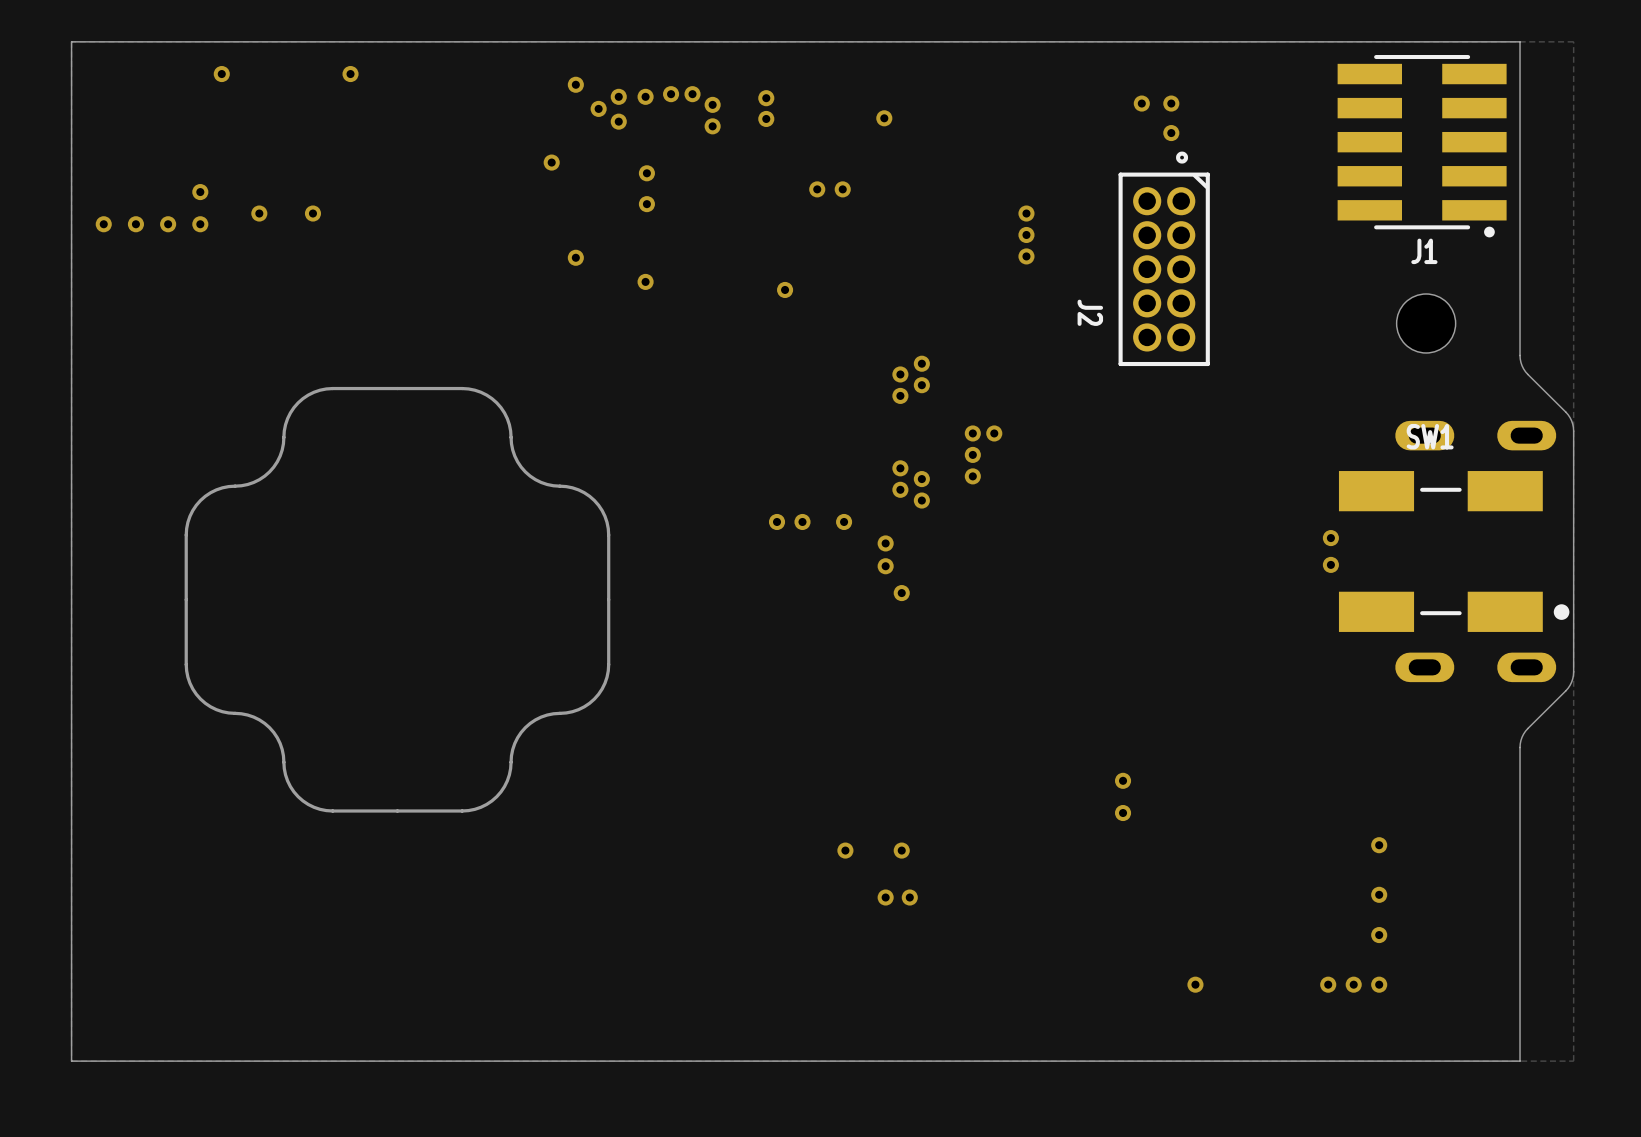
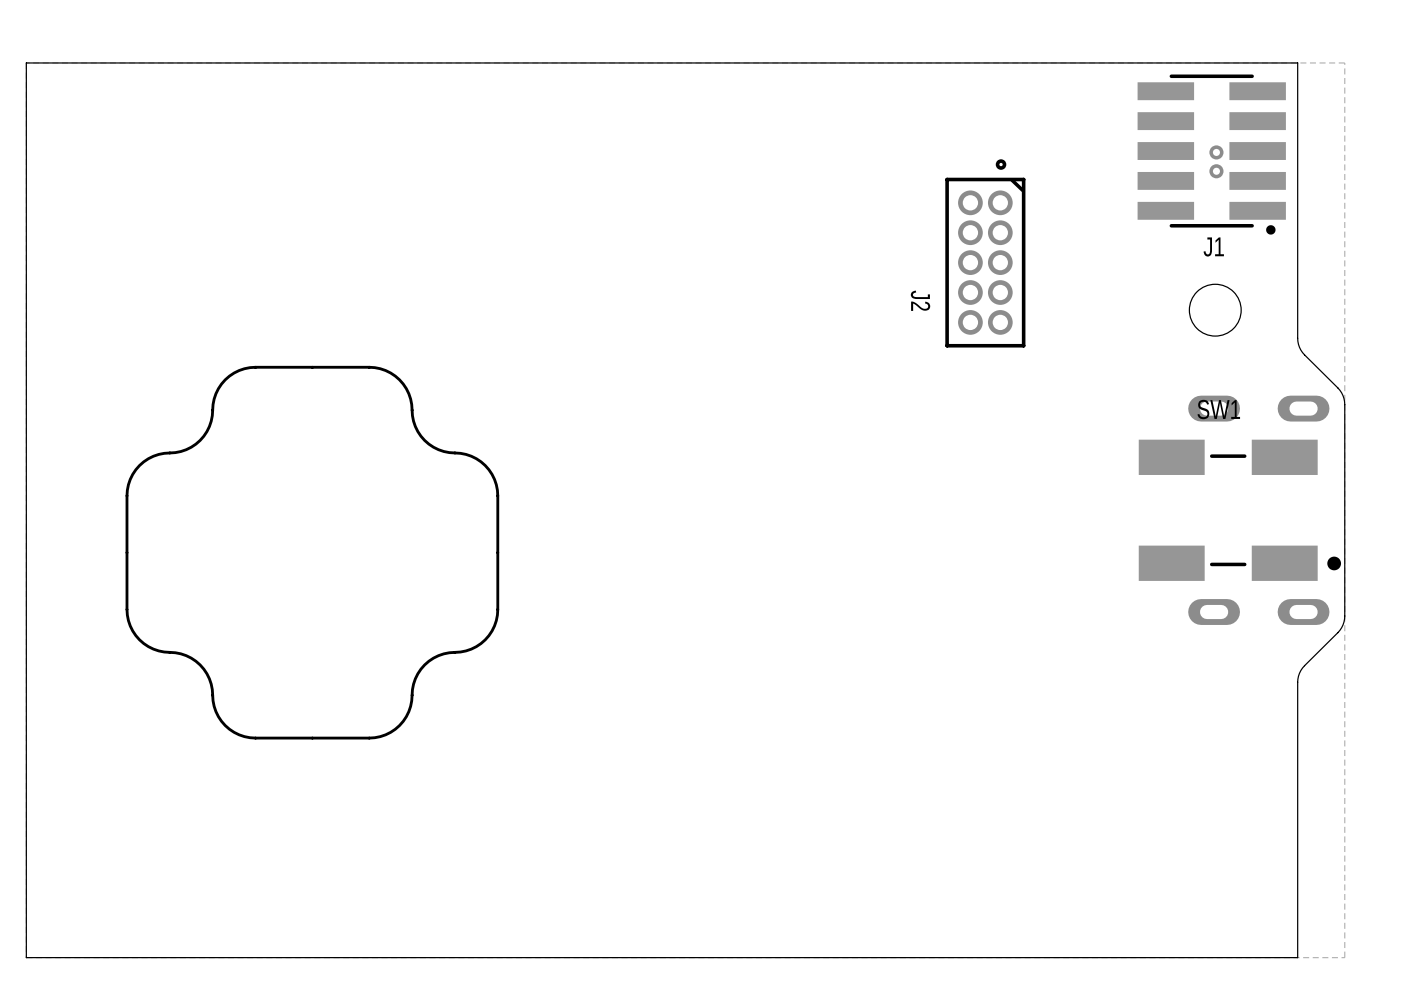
via: (221, 74) -> none
via: (350, 74) -> none
via: (575, 84) -> none
via: (671, 94) -> none
via: (692, 94) -> none
via: (618, 96) -> none
via: (645, 96) -> none
via: (766, 98) -> none
via: (1141, 103) -> none
via: (1171, 103) -> none
via: (712, 104) -> none
via: (598, 108) -> none
via: (766, 118) -> none
via: (884, 118) -> none
via: (618, 121) -> none
via: (712, 126) -> none
via: (1171, 133) -> none
via: none -> (1216, 152)
via: (551, 162) -> none
via: none -> (1216, 171)
via: (646, 173) -> none
via: (817, 189) -> none
via: (842, 189) -> none
via: (200, 192) -> none
via: (646, 204) -> none
via: (259, 213) -> none
via: (312, 213) -> none
via: (1026, 213) -> none
via: (103, 224) -> none
via: (135, 224) -> none
via: (168, 224) -> none
via: (200, 224) -> none
via: (1026, 234) -> none
via: (1026, 256) -> none
via: (575, 257) -> none
via: (645, 281) -> none
via: (785, 289) -> none
via: (921, 363) -> none
via: (900, 374) -> none
via: (921, 385) -> none
via: (900, 395) -> none
via: (972, 433) -> none
via: (994, 433) -> none
via: (972, 454) -> none
via: (900, 468) -> none
via: (972, 476) -> none
via: (921, 479) -> none
via: (900, 489) -> none
via: (921, 500) -> none
via: (777, 521) -> none
via: (802, 521) -> none
via: (844, 521) -> none
via: (1330, 538) -> none
via: (885, 543) -> none
via: (1330, 564) -> none
via: (885, 566) -> none
via: (901, 593) -> none
via: (1123, 780) -> none
via: (1123, 813) -> none
via: (1379, 845) -> none
via: (845, 850) -> none
via: (901, 850) -> none
via: (1379, 894) -> none
via: (885, 897) -> none
via: (909, 897) -> none
via: (1379, 935) -> none
via: (1195, 984) -> none
via: (1328, 984) -> none
via: (1353, 984) -> none
via: (1379, 984) -> none

